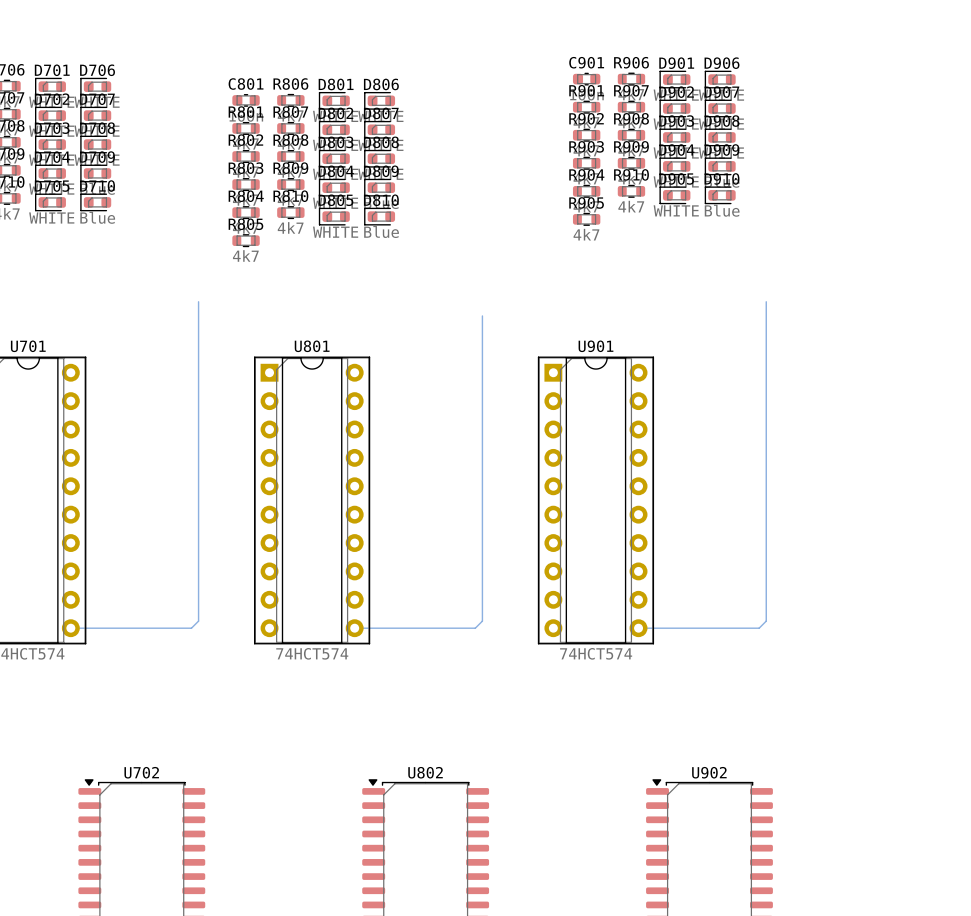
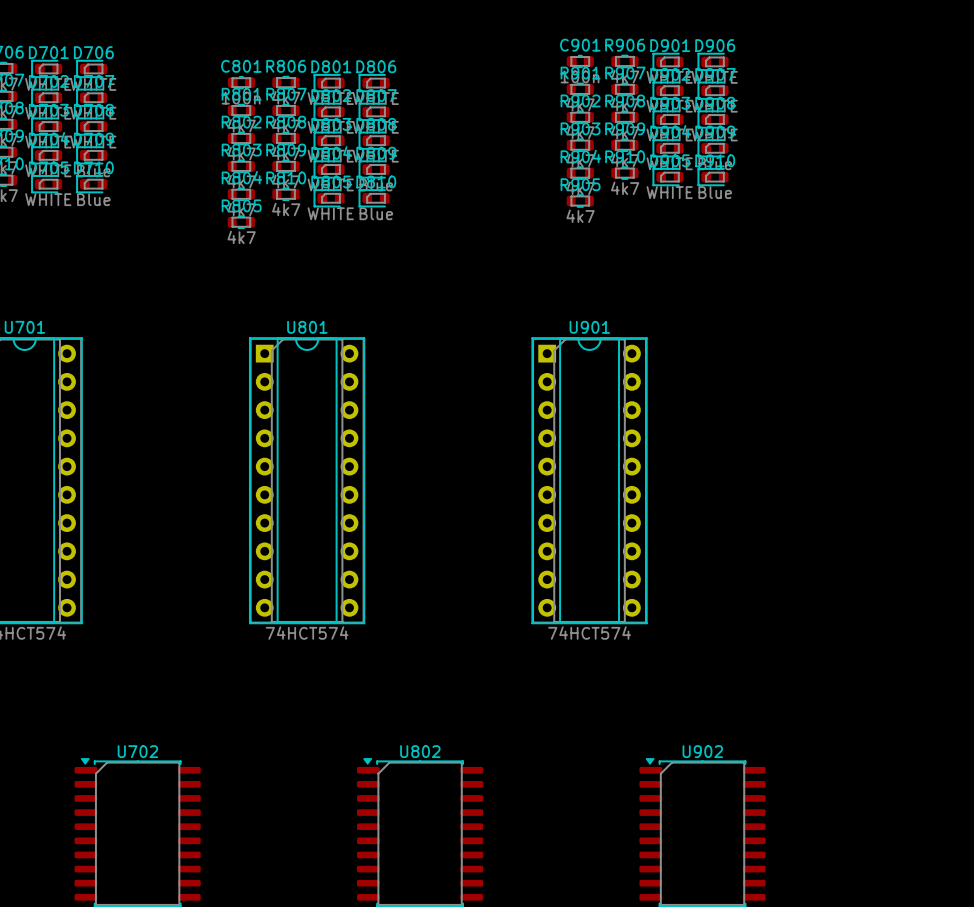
bottom track: (198, 301) (198, 621) (191, 628) (70, 628) -> none
bottom track: (766, 301) (766, 621) (759, 628) (638, 628) -> none
bottom track: (482, 315) (482, 621) (475, 628) (354, 628) -> none

